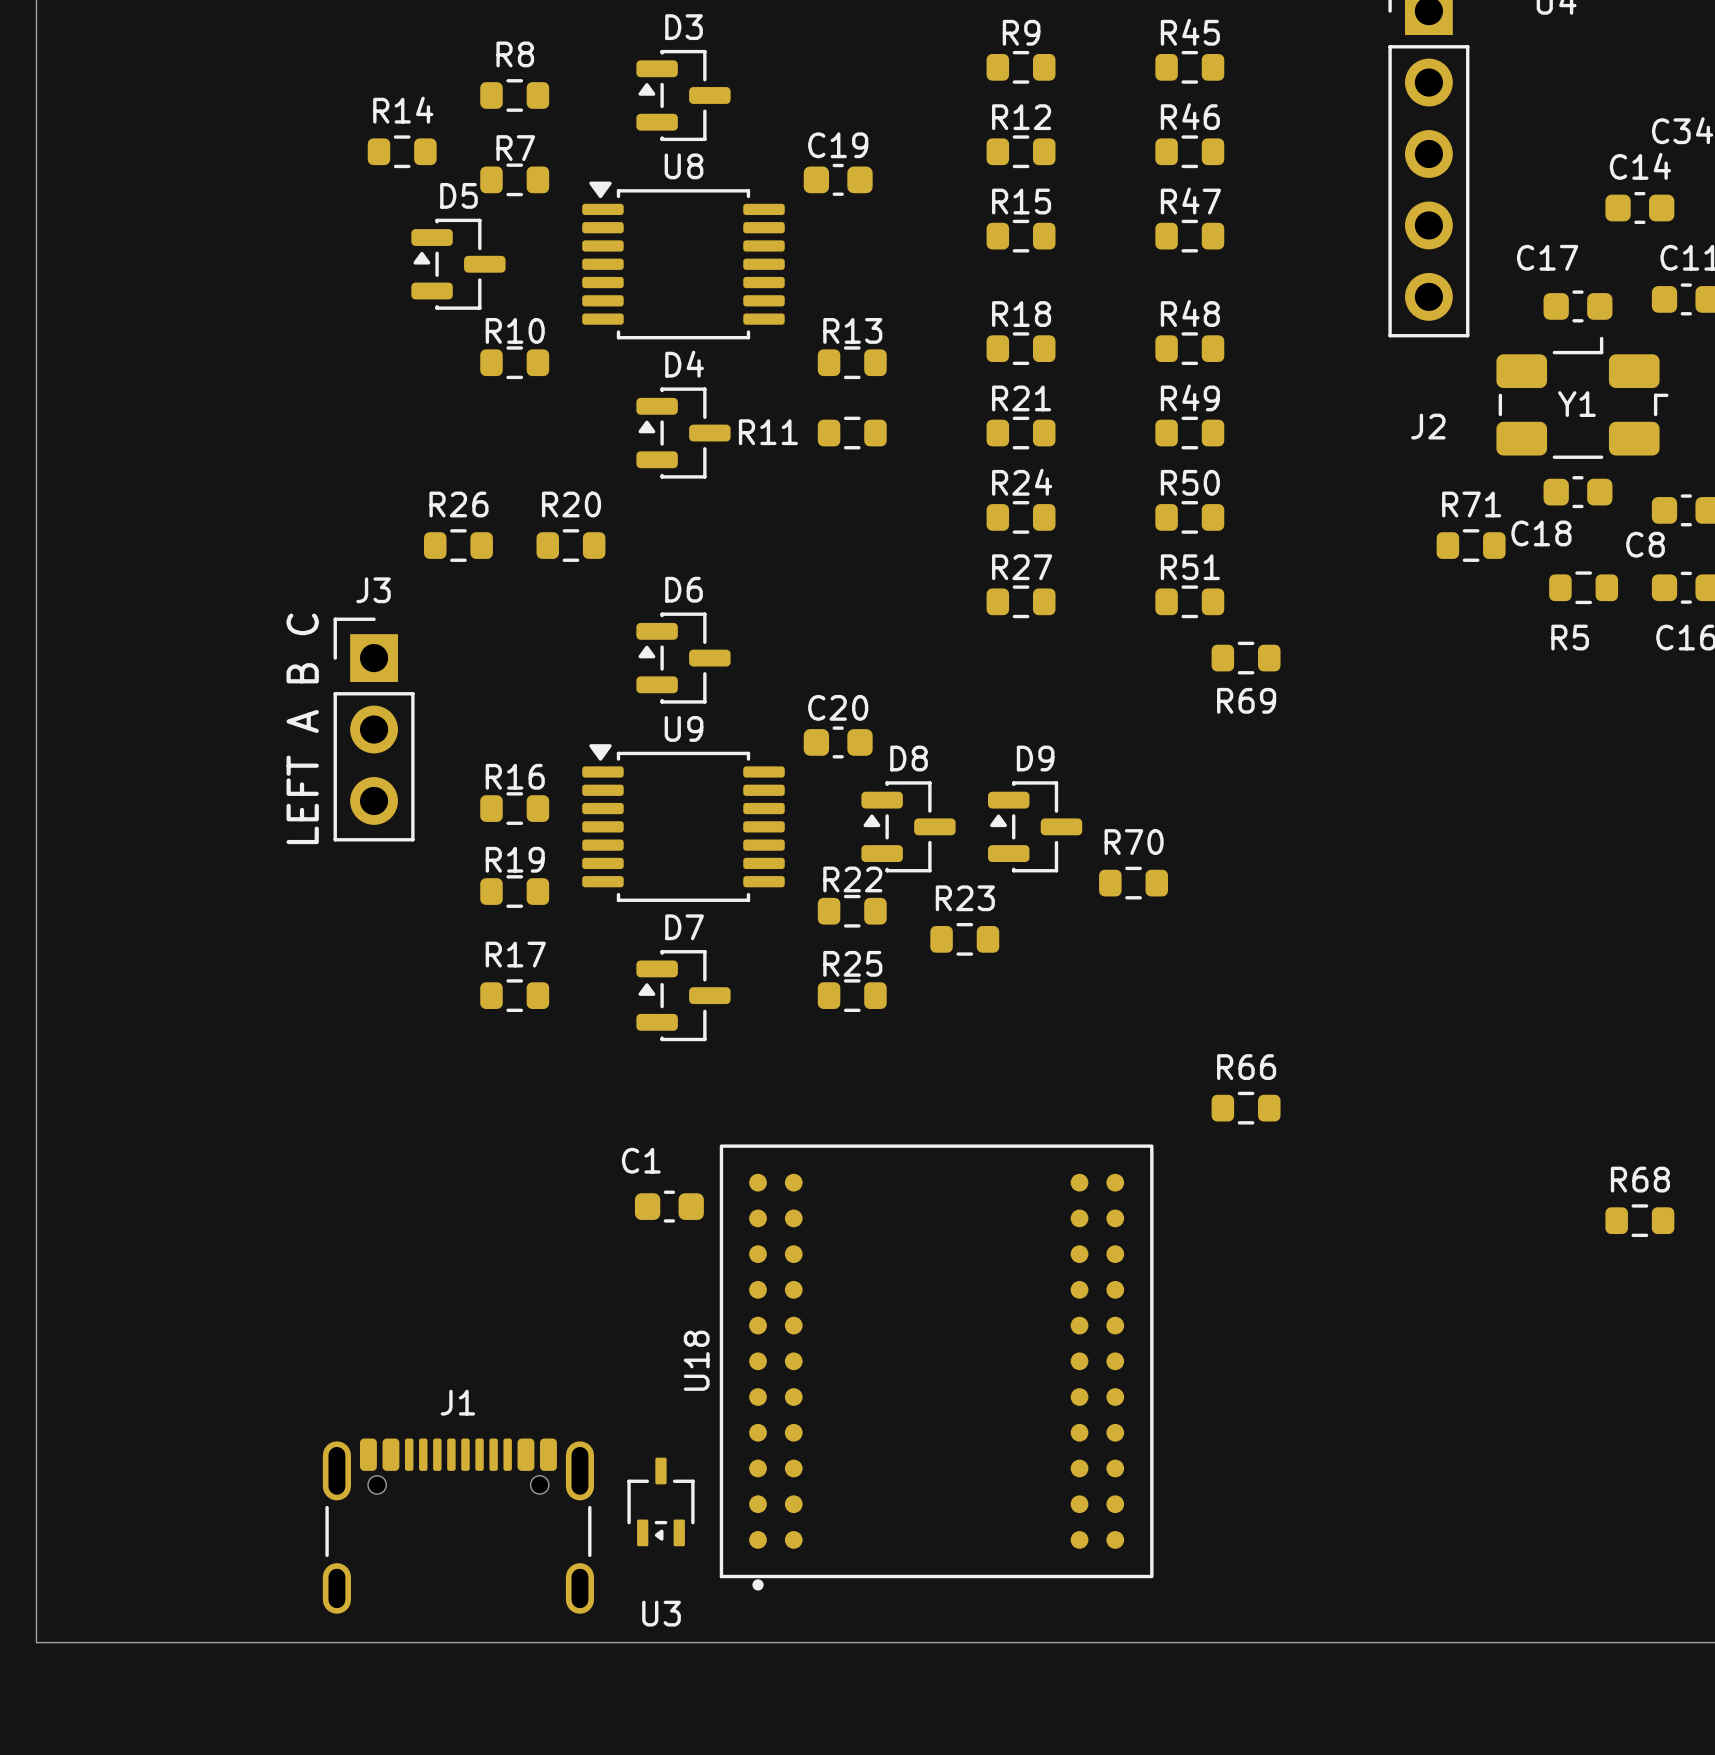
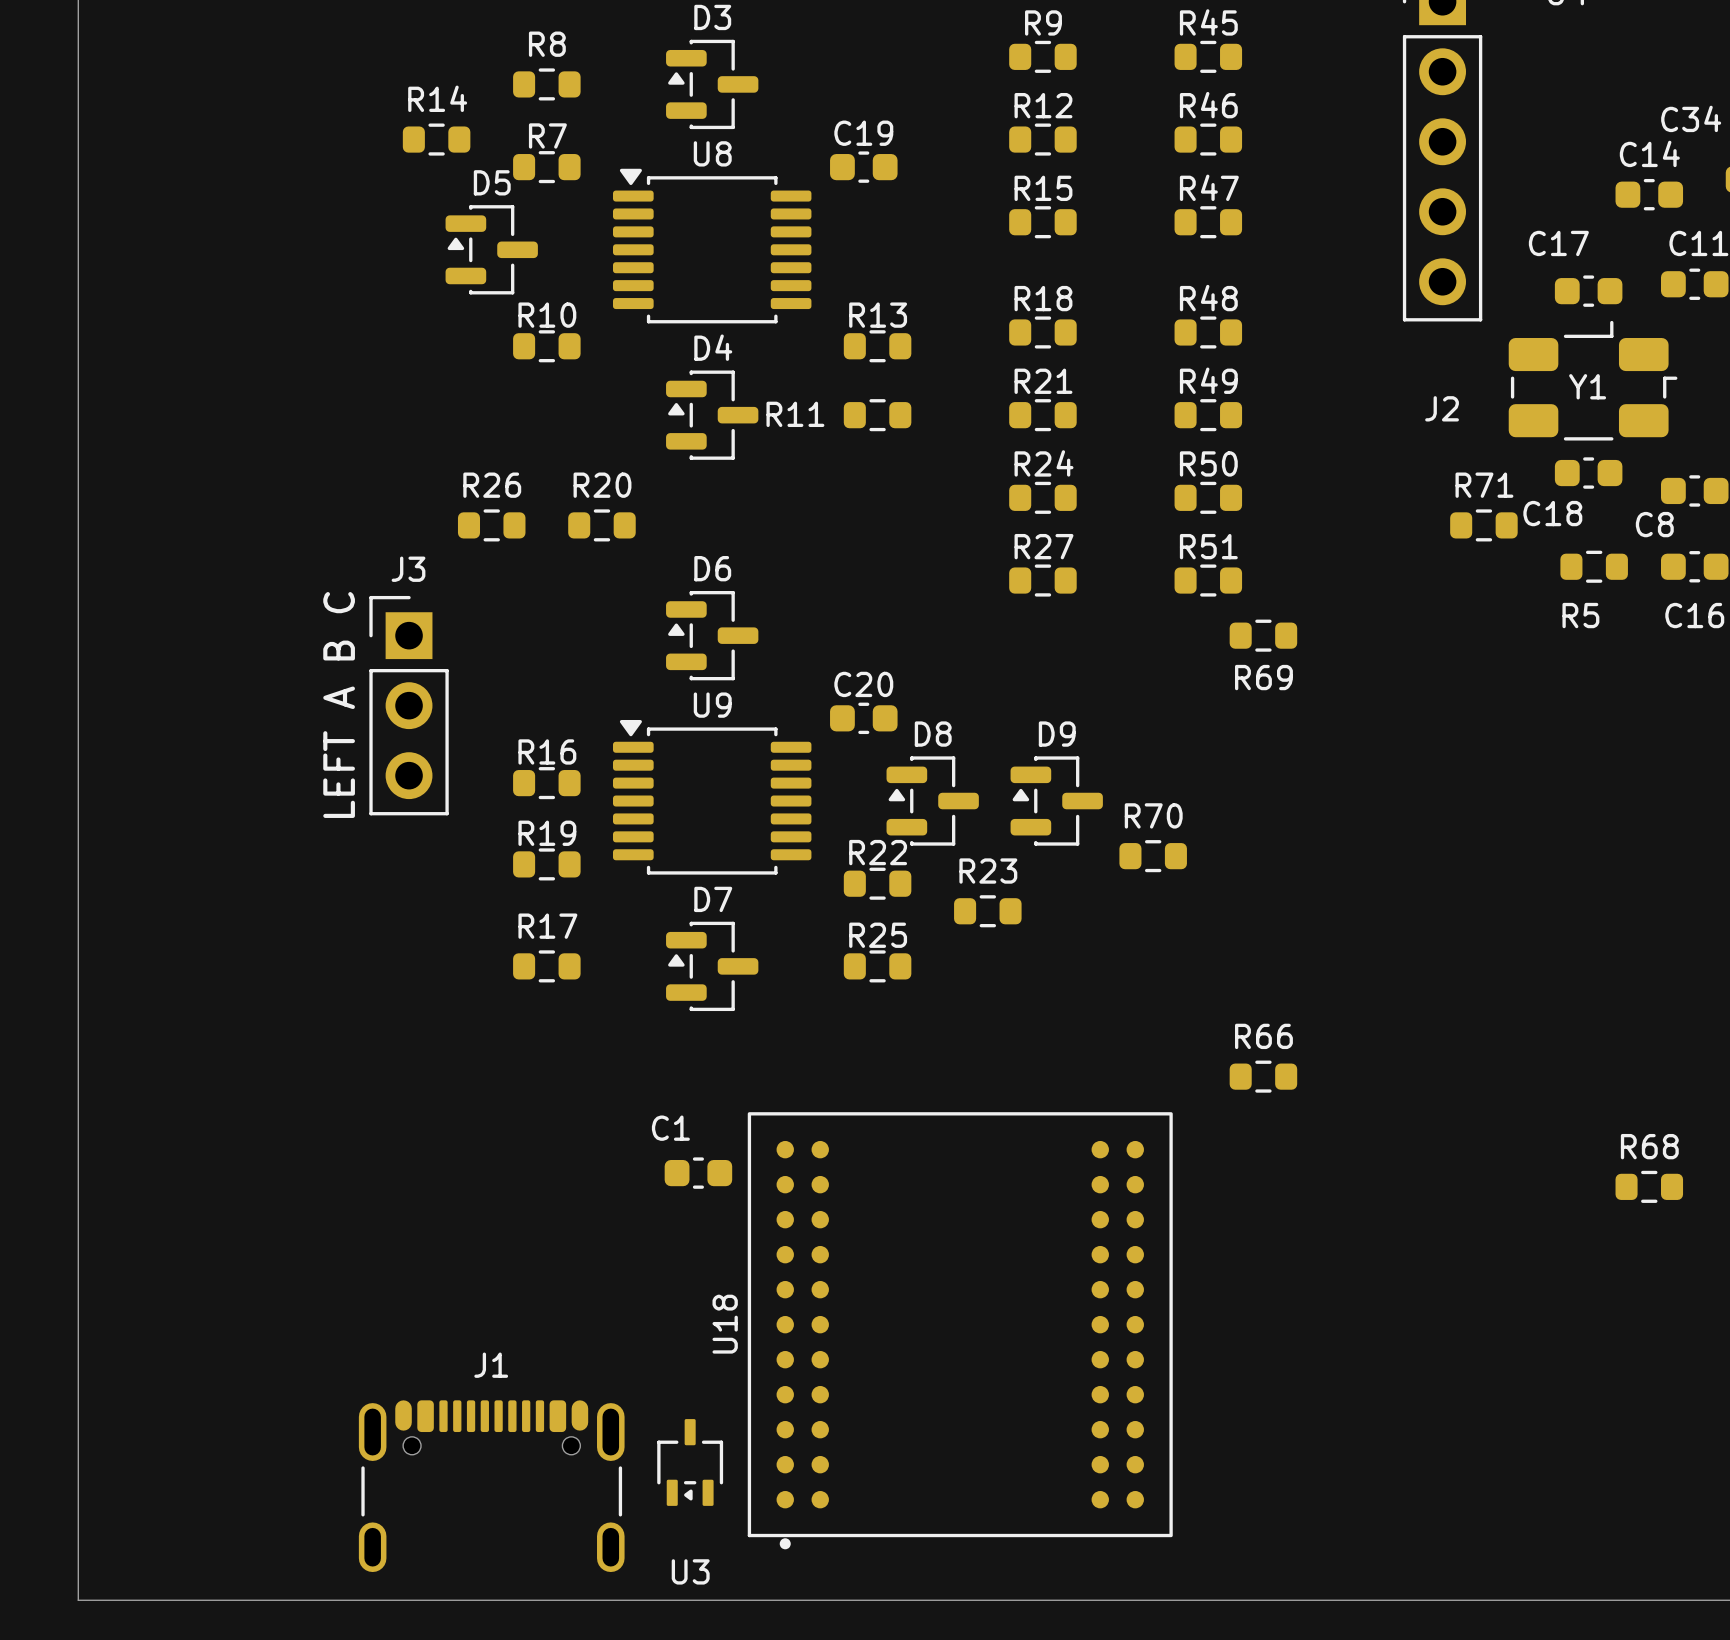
J1 footprint: [322, 1438, 595, 1614] -> [358, 1400, 625, 1573]

